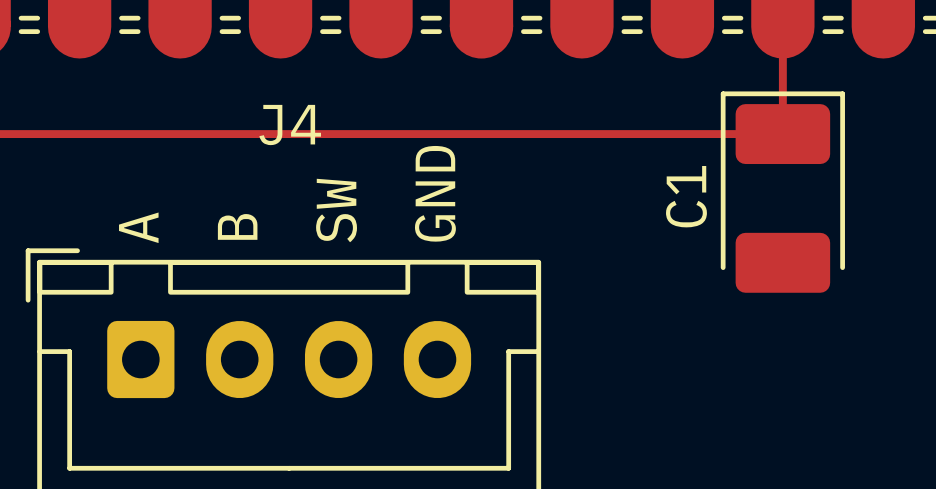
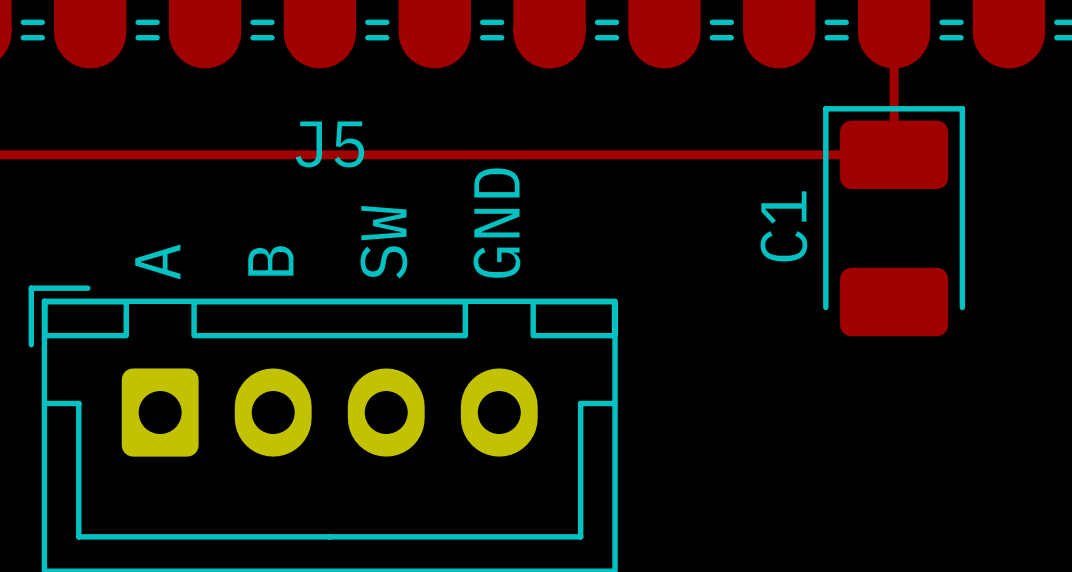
J4 name: J4 (290, 125) -> J5 (329, 144)

